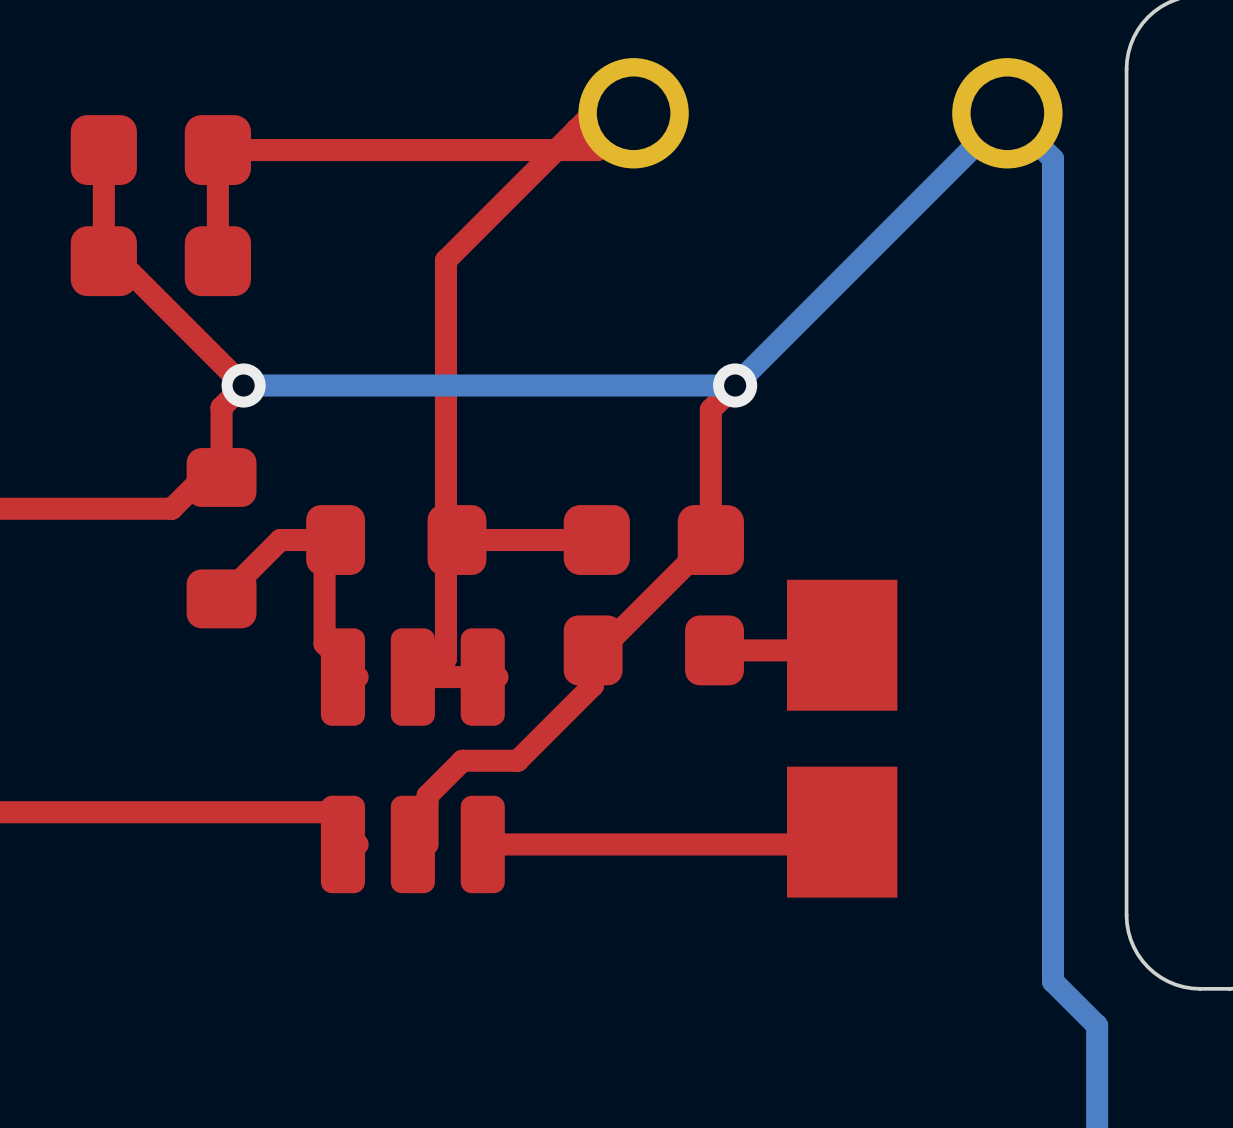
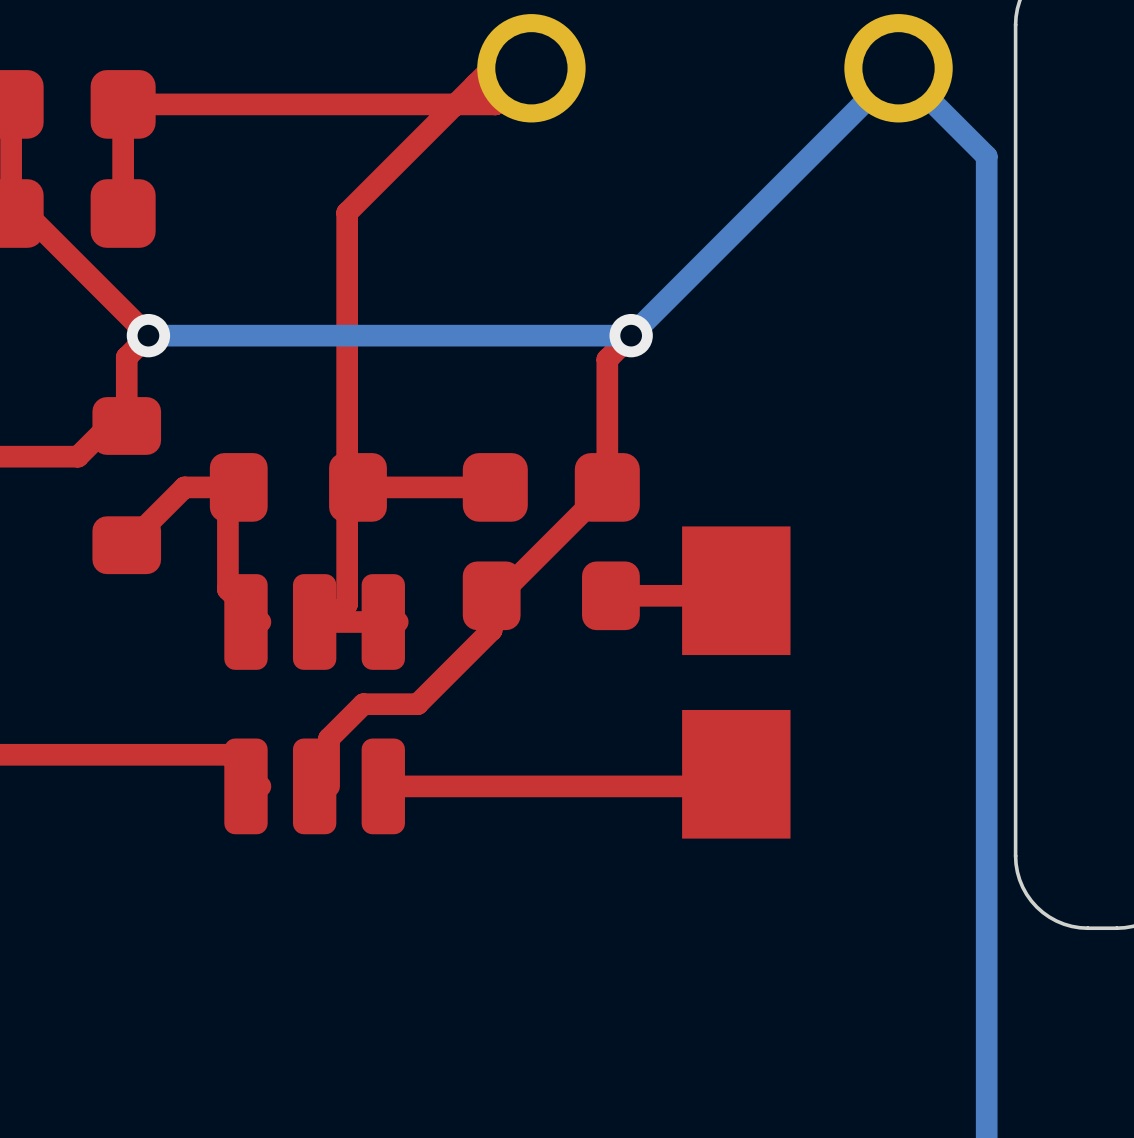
bottom track: (1052, 158) (1052, 981) (1097, 1025) -> (943, 113) (986, 156) (986, 964)

